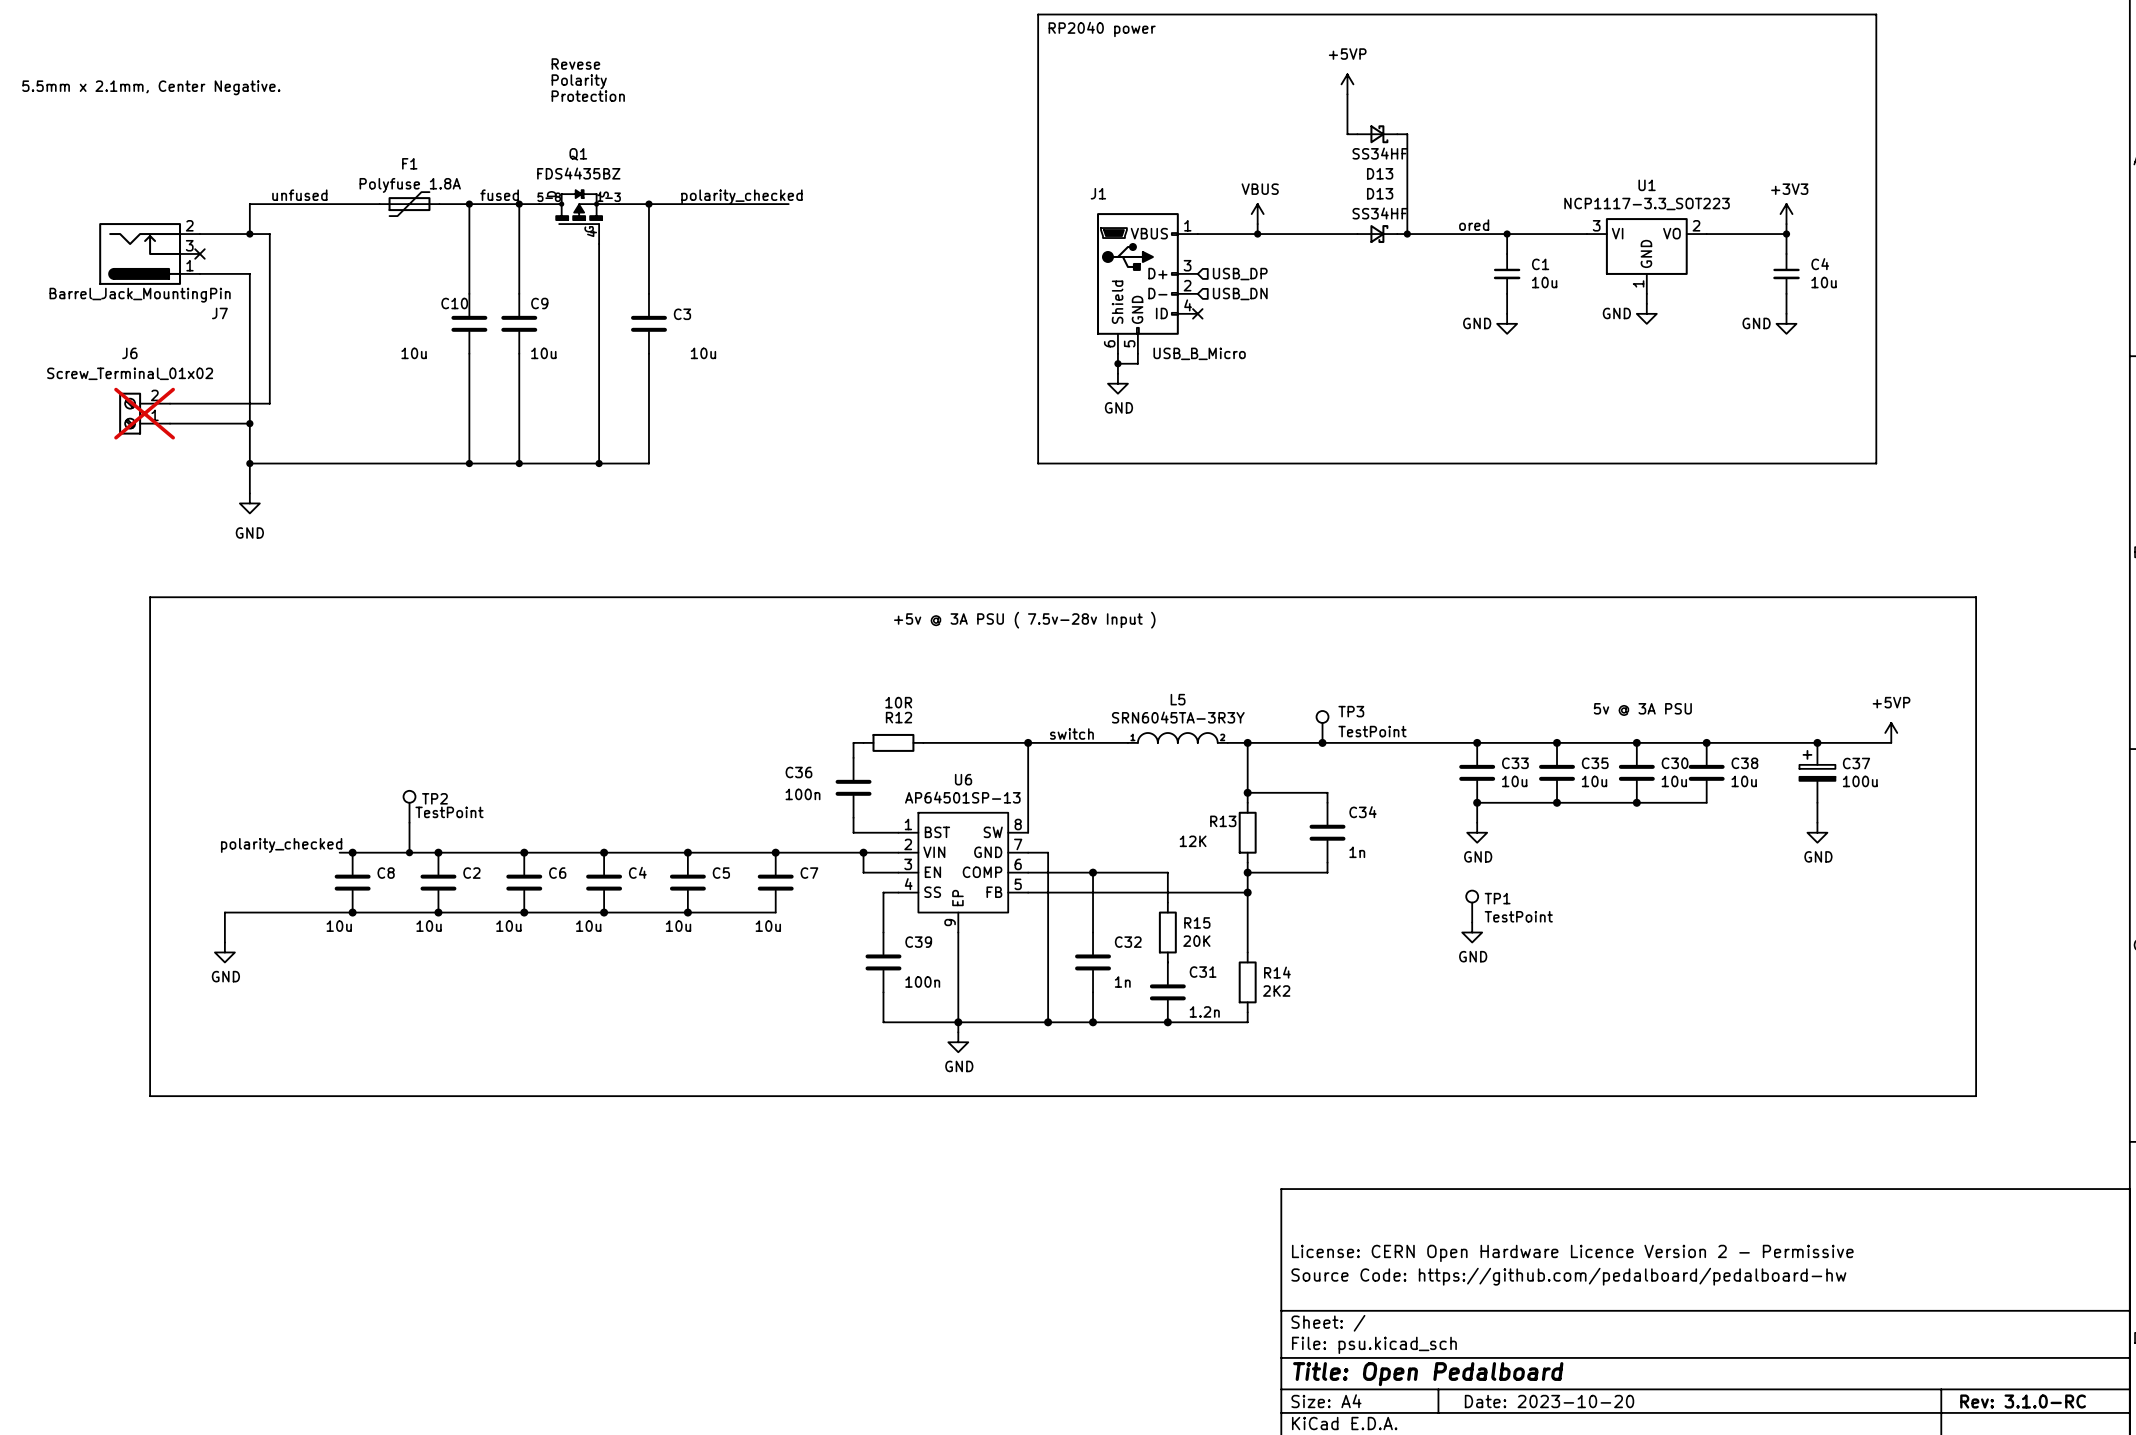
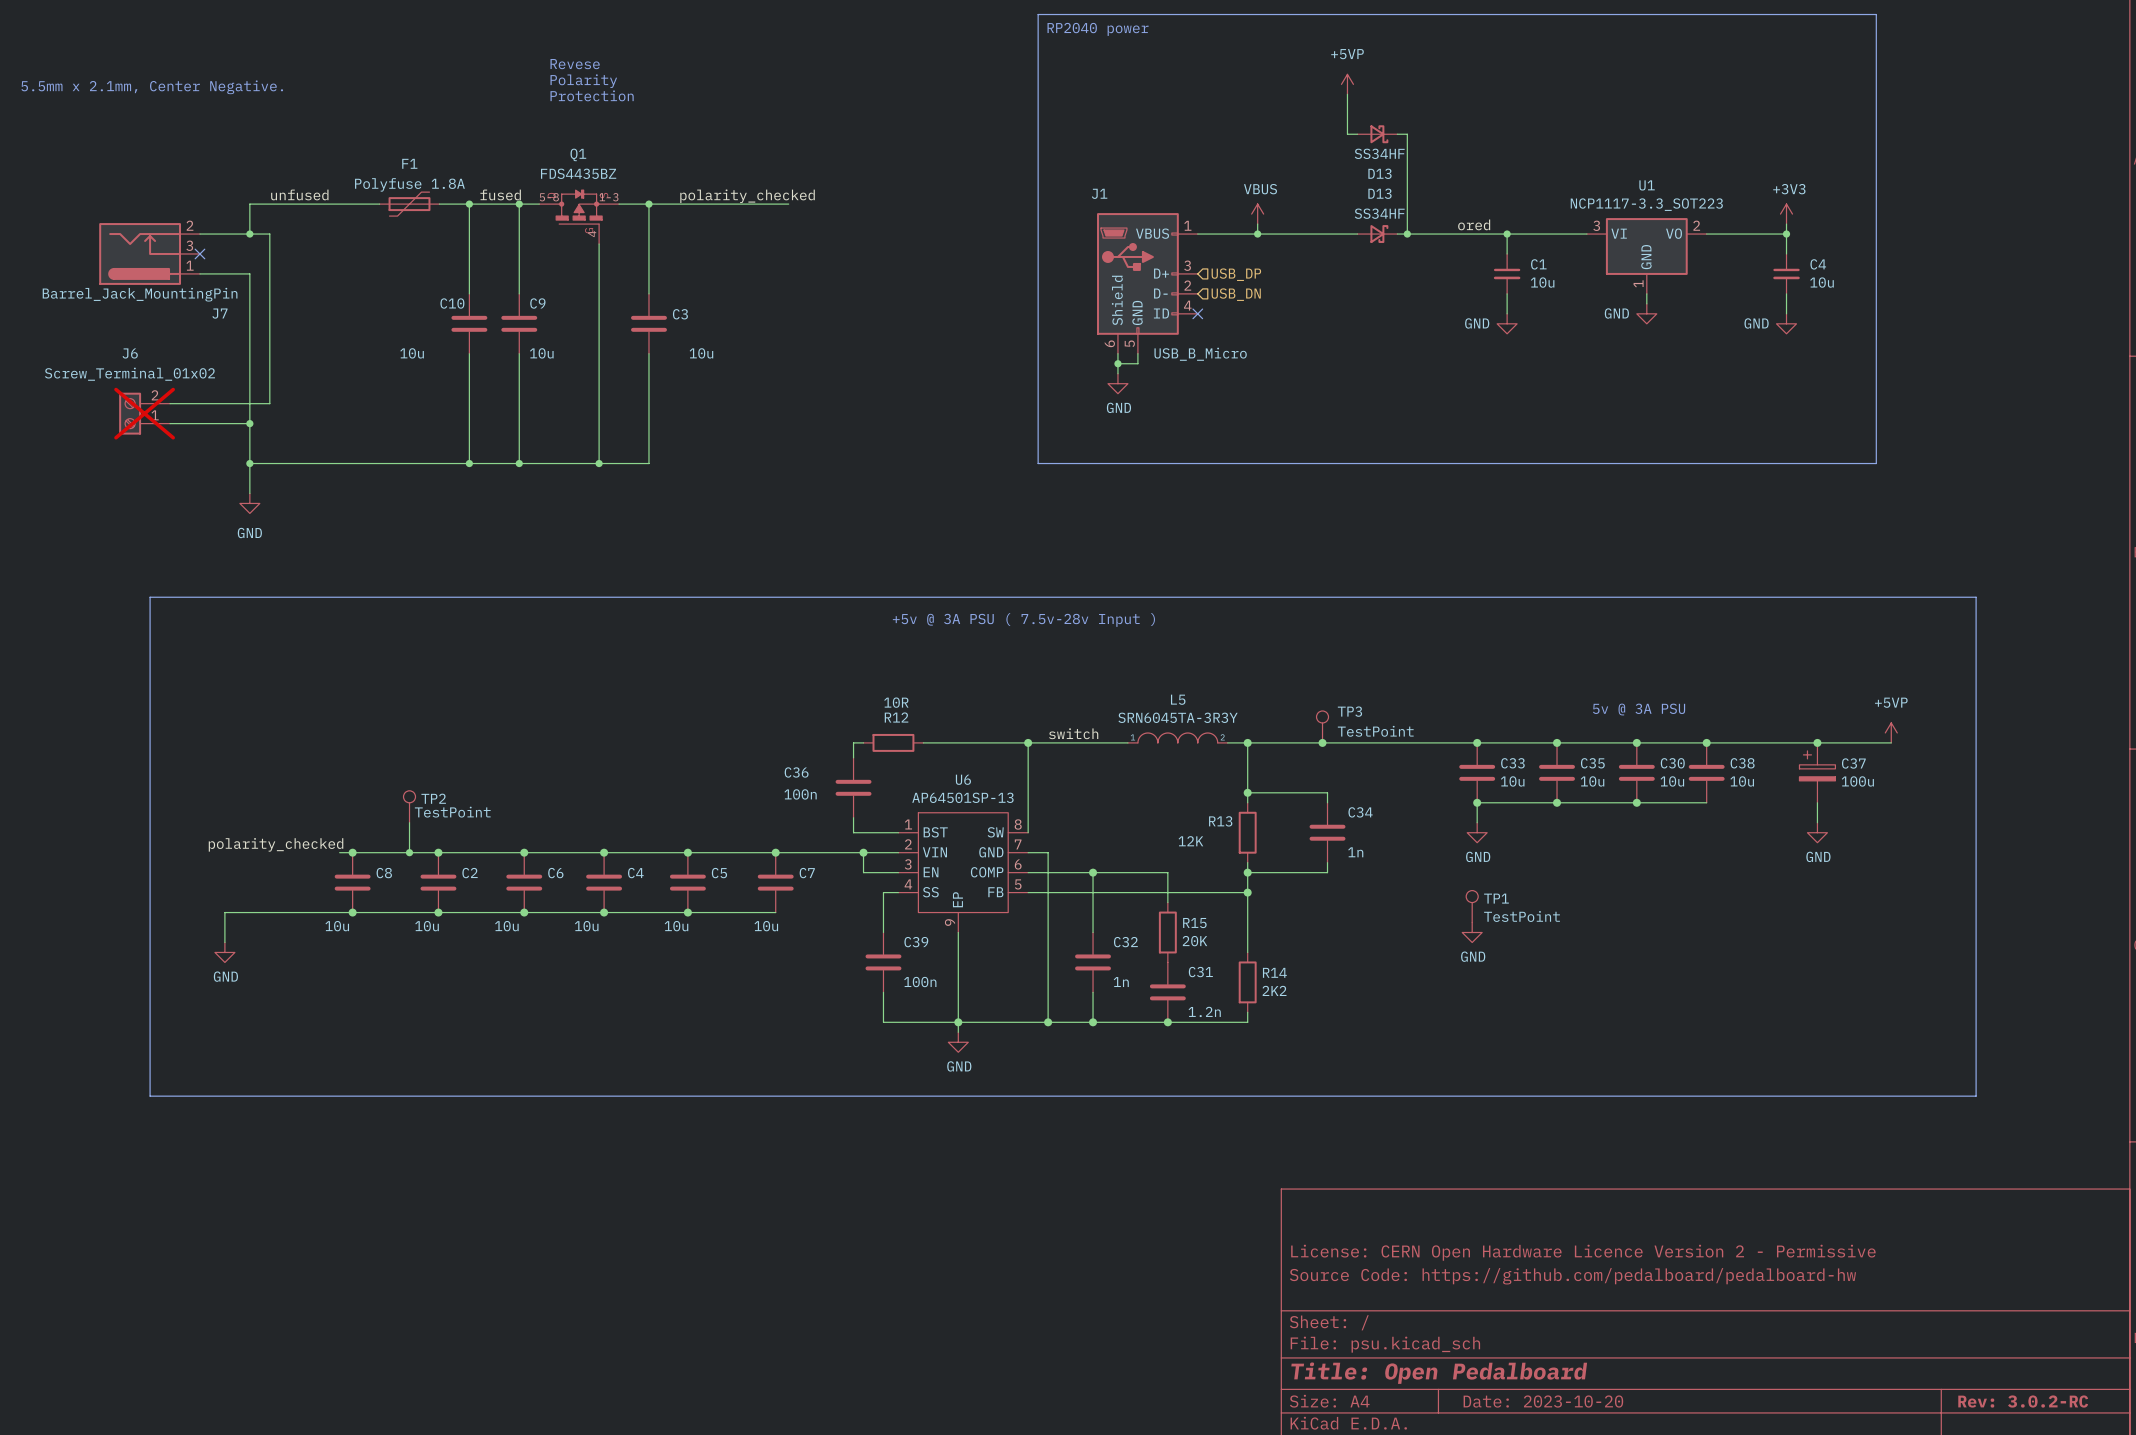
title block: Rev: 3.1.0-RC (2023, 1401) -> Rev: 3.0.2-RC (2023, 1401)

